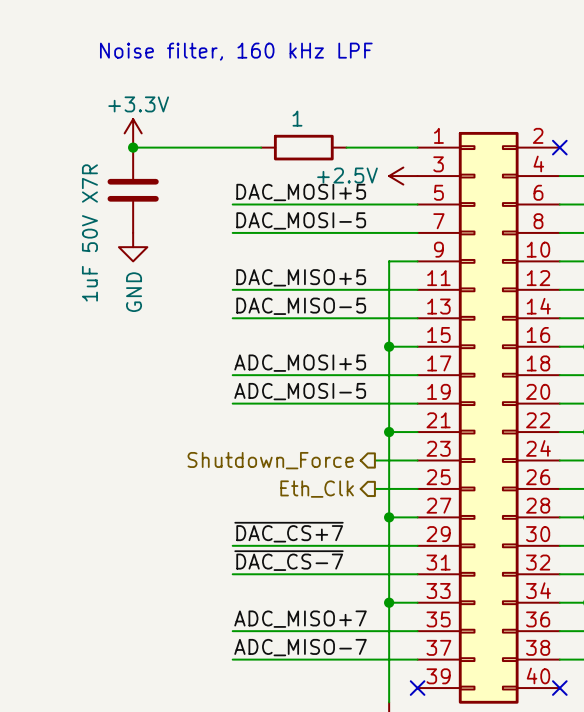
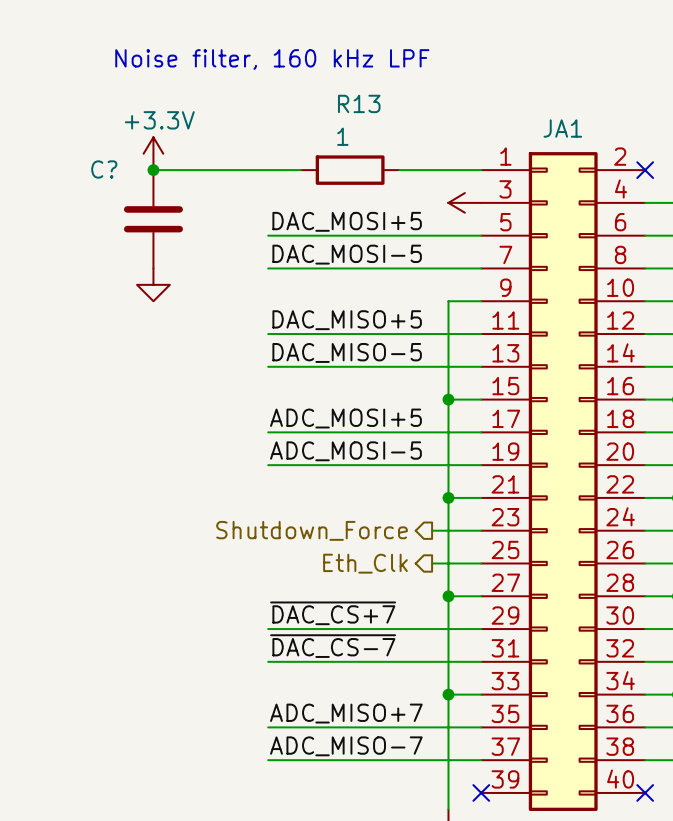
R13 name: none -> R13 (359, 103)
JA1 name: none -> JA1 (562, 128)
C? name: none -> C? (104, 169)
power symbol text: +2.5V (347, 175) -> none
C? value: 1uF 50V X7R (89, 232) -> none
power symbol text: GND (134, 292) -> none

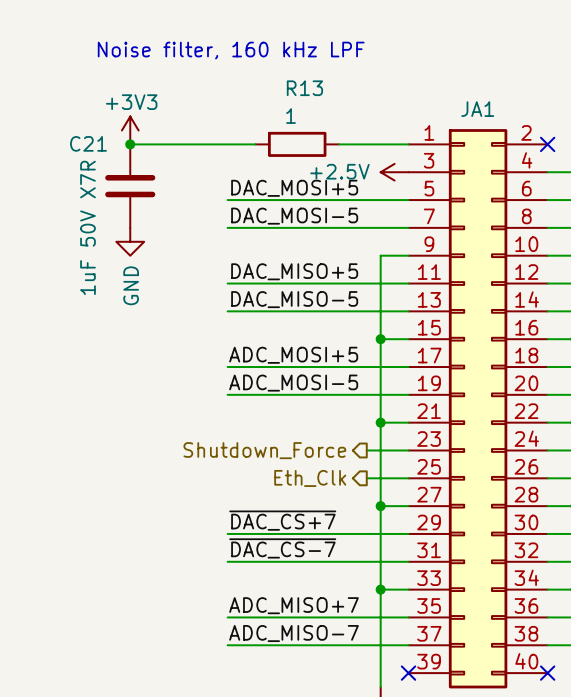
power symbol: +3.3V (153, 153) -> +3V3 (130, 130)
C? name: C? (104, 169) -> C21 (88, 143)
power symbol text: none -> +2.5V (339, 171)
C? value: none -> 1uF 50V X7R (87, 227)
power symbol text: none -> GND (131, 285)

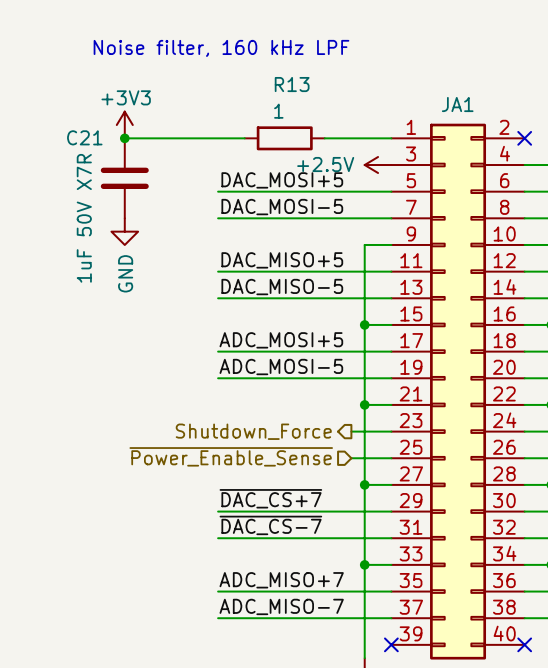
hierarchical label shape: output (310, 478) -> input (231, 456)
hierarchical label: Eth_Clk (310, 478) -> ~{Power_Enable_Sense} (231, 456)

